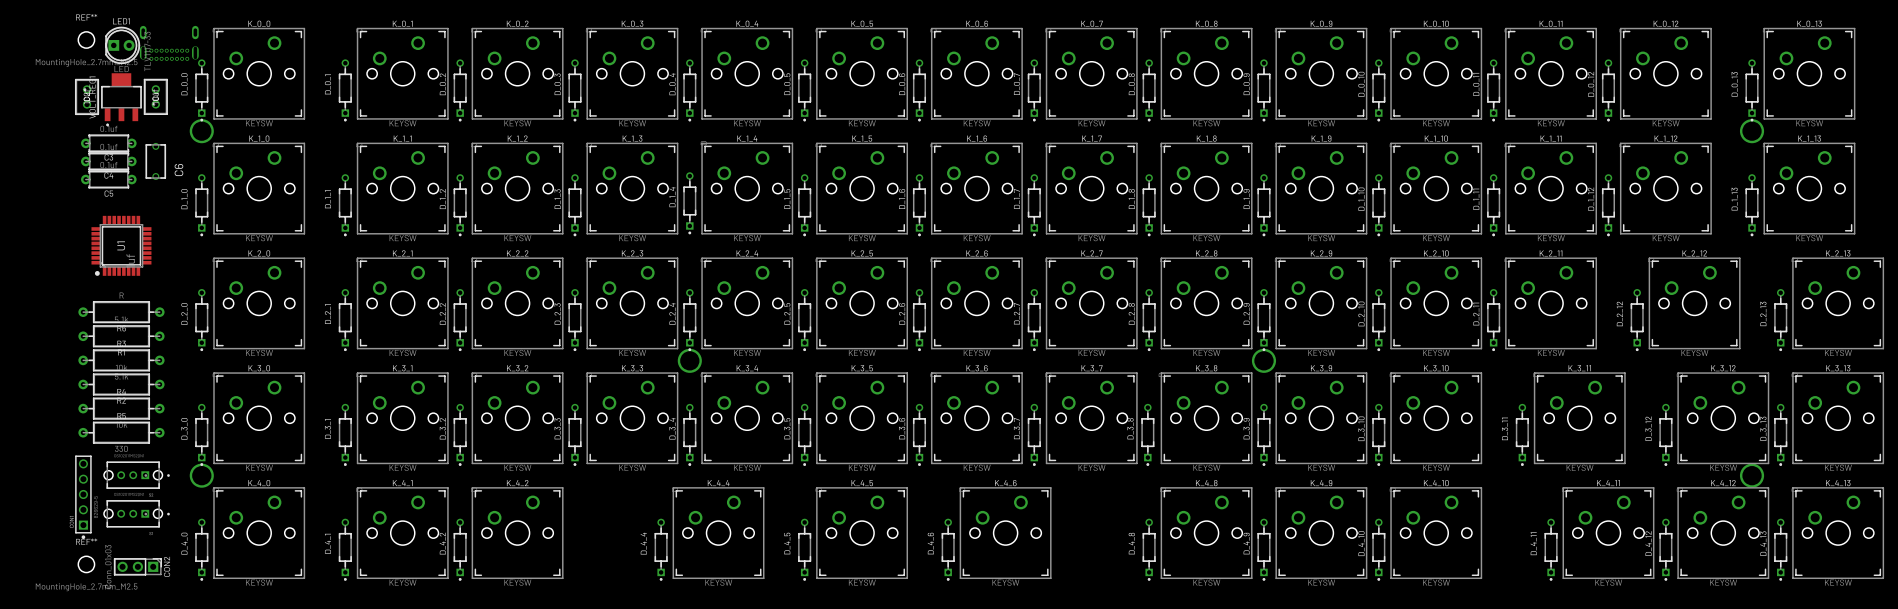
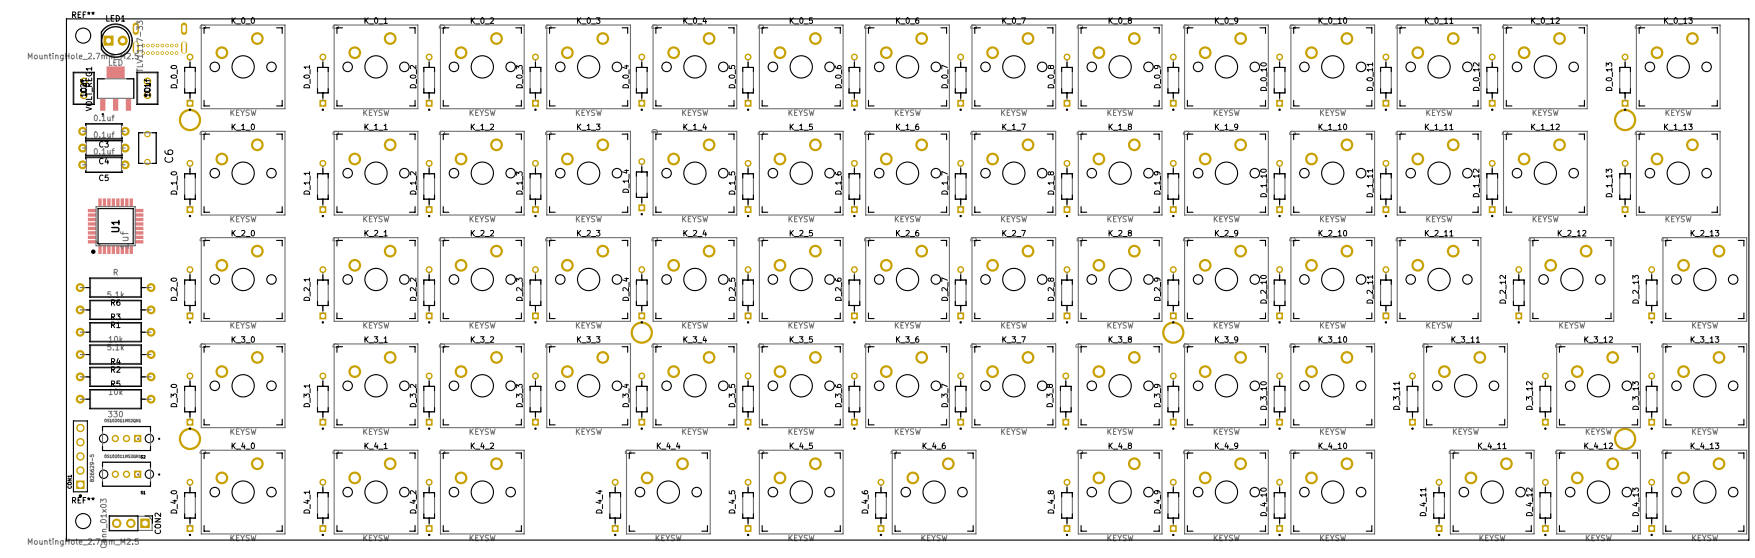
board edge: none -> (66, 18) (1748, 18) (1748, 540) (66, 540) (66, 18)

